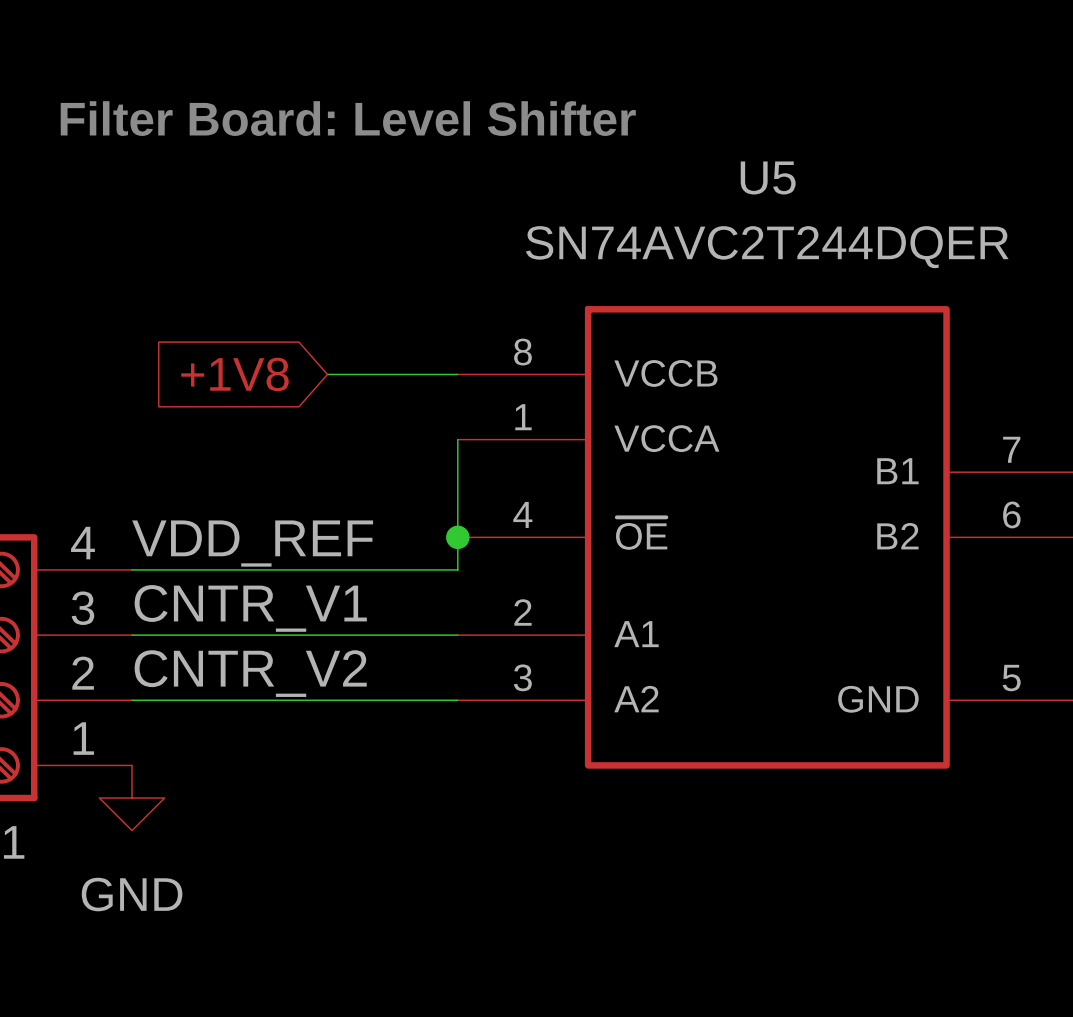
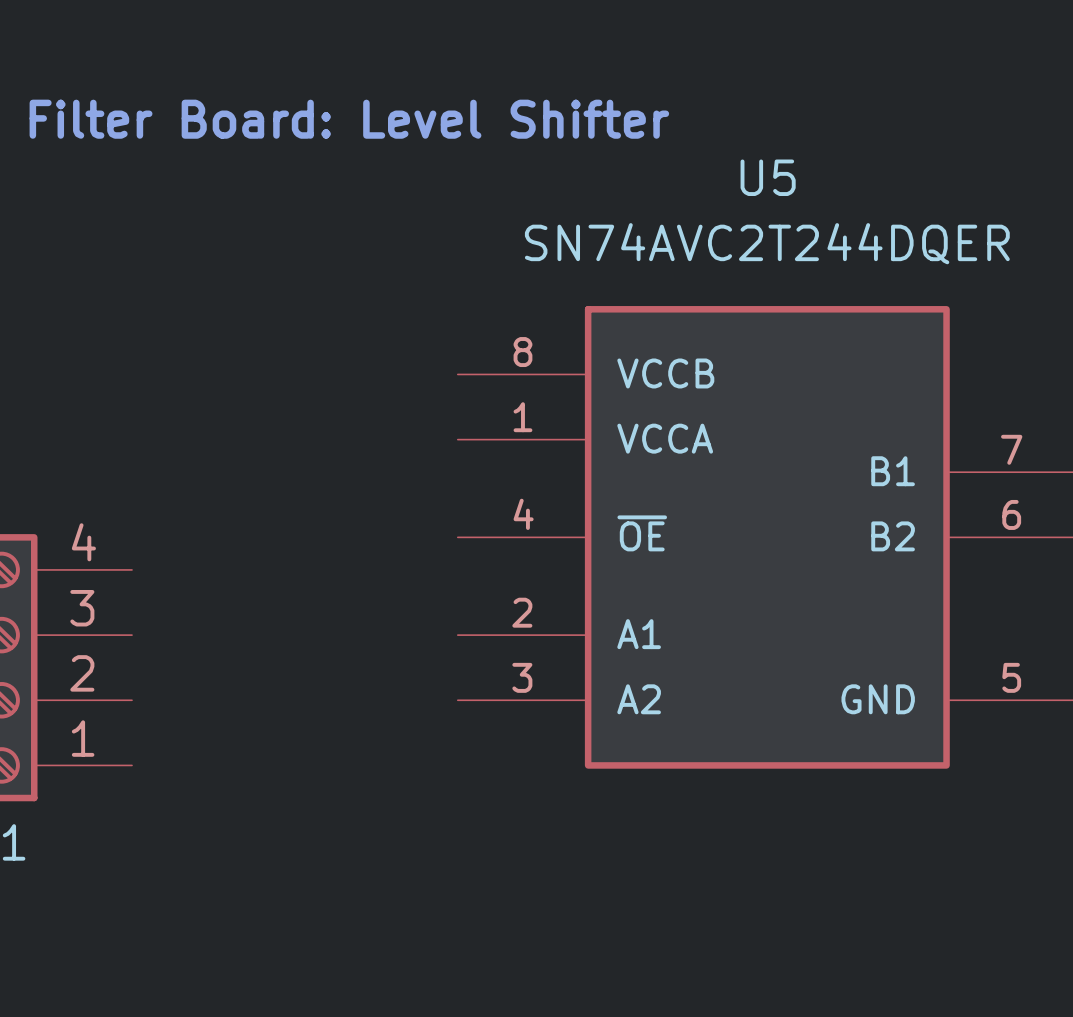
global label: +1V8 (235, 374) -> none
wire: (327, 374) (457, 374) -> none
wire: (457, 439) (457, 569) (131, 569) -> none
junction: (457, 537) -> none
label: VDD_REF (252, 543) -> none
label: CNTR_V1 (250, 608) -> none
wire: (131, 635) (457, 635) -> none
label: CNTR_V2 (250, 673) -> none
wire: (131, 700) (457, 700) -> none
power symbol: GND (131, 798) -> none

